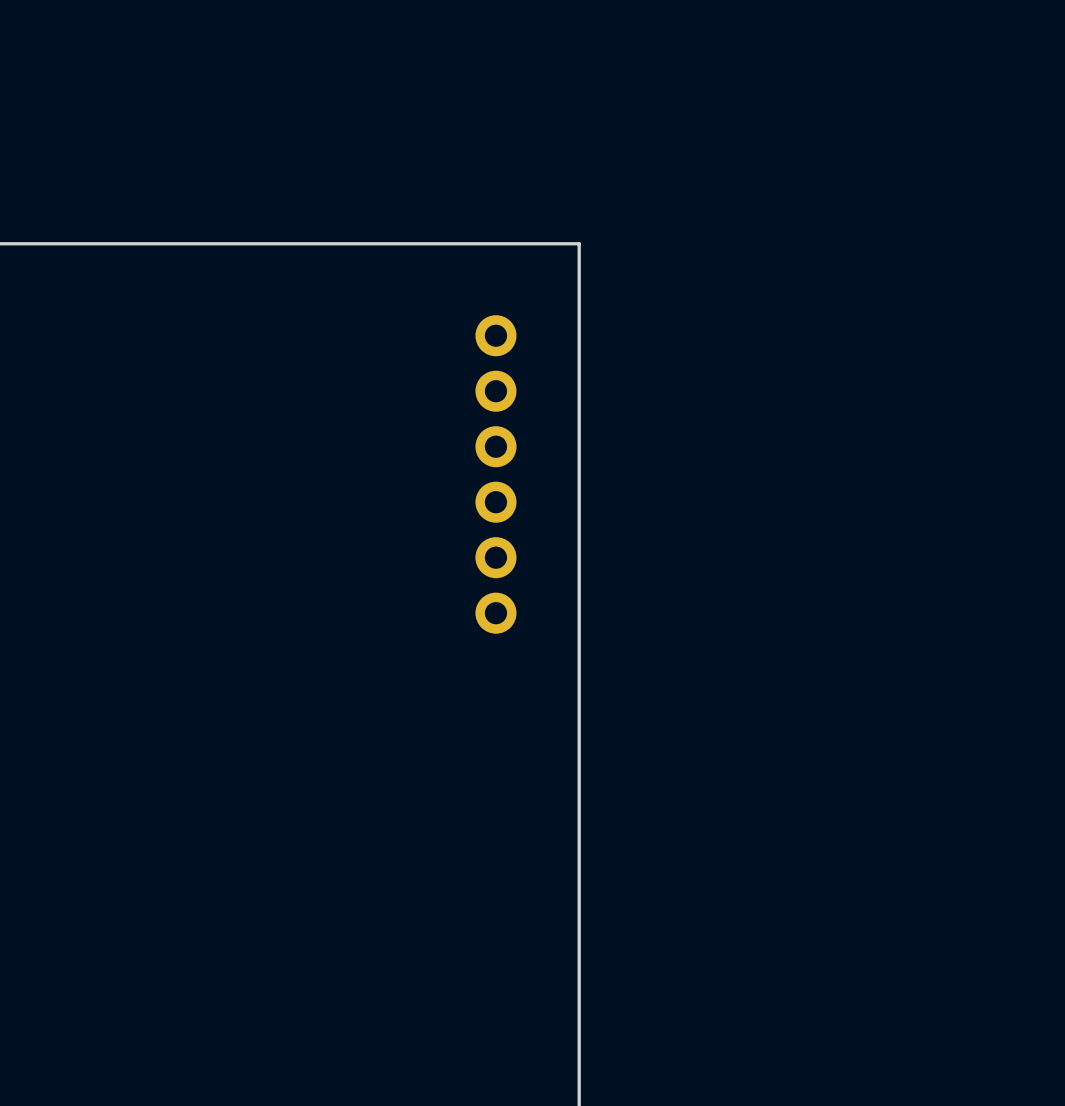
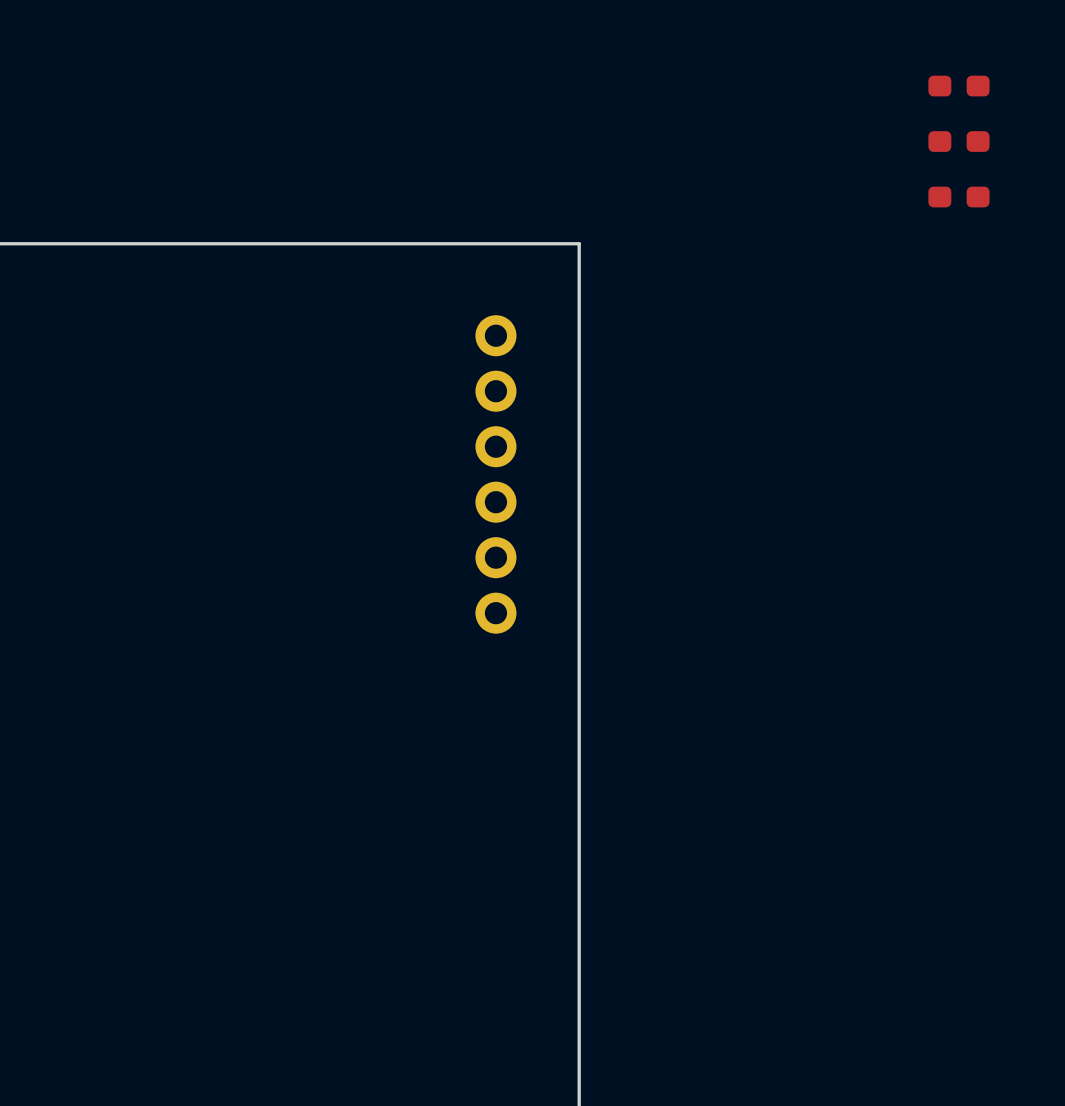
part: none -> (958, 86)
part: none -> (958, 141)
part: none -> (958, 197)

